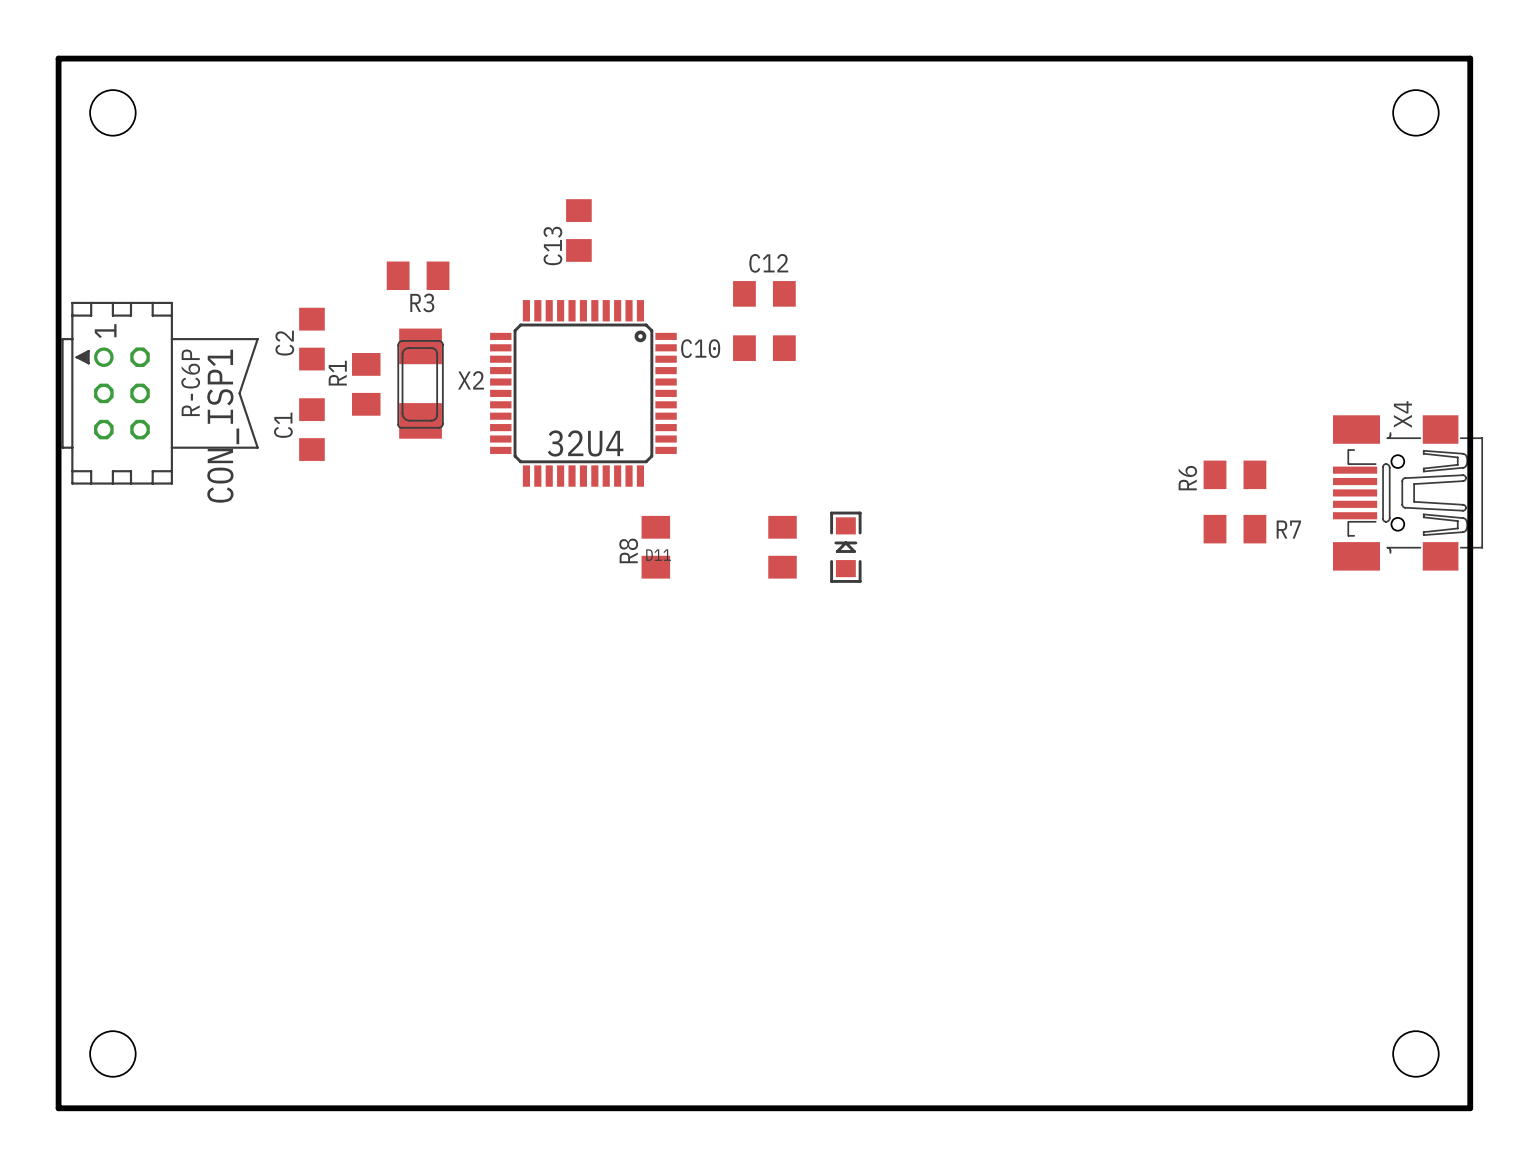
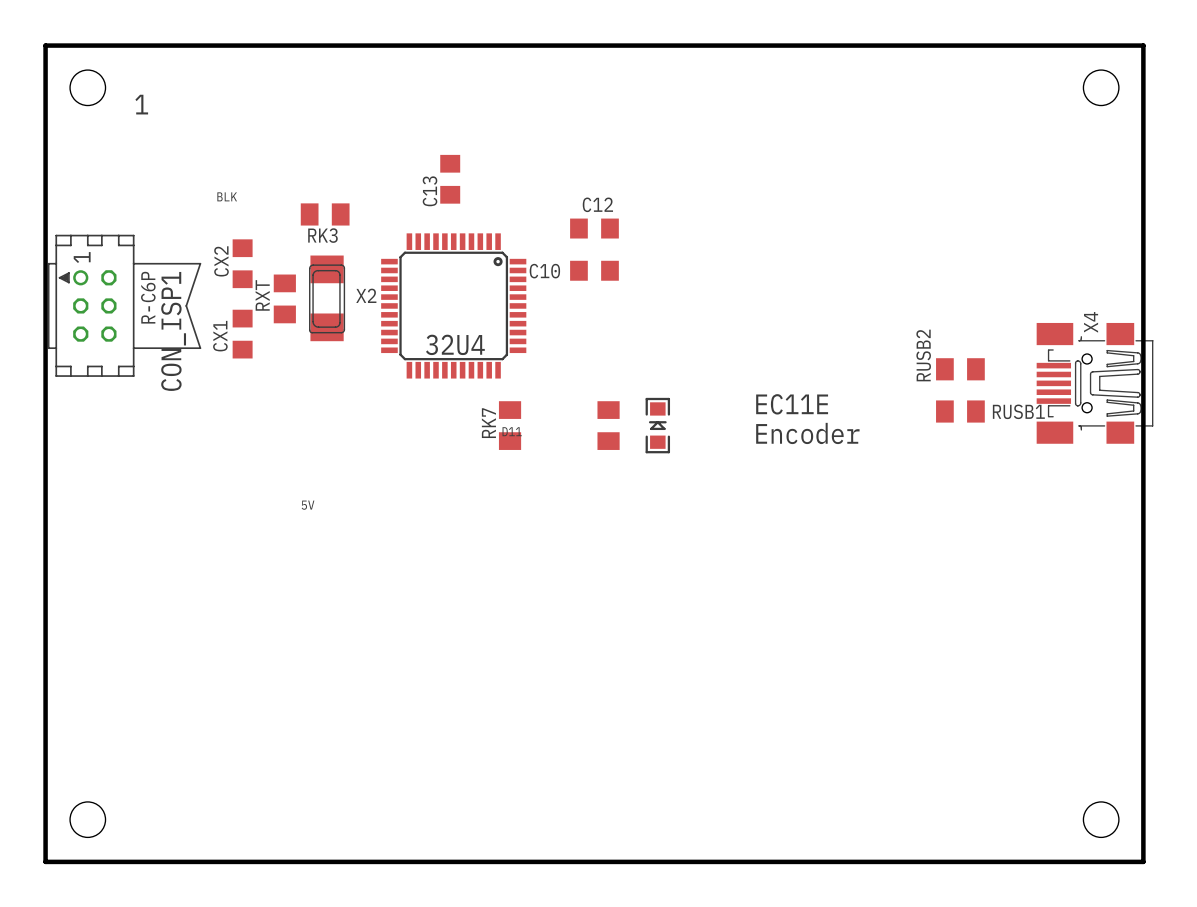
text: none -> 1 (141, 104)
text: none -> BLK (227, 196)
R3 name: R3 (422, 302) -> RK3 (322, 235)
C2 name: C2 (284, 343) -> CX2 (221, 261)
R1 name: R1 (337, 373) -> RXT (262, 295)
C1 name: C1 (283, 425) -> CX1 (220, 336)
R6 name: R6 (1187, 478) -> RUSB2 (923, 355)
text: none -> EC11E (792, 404)
R7 name: R7 (1288, 529) -> RUSB1 (1018, 411)
R8 name: R8 (628, 550) -> RK7 (488, 423)
text: none -> Encoder (807, 433)
text: none -> 5V (308, 505)

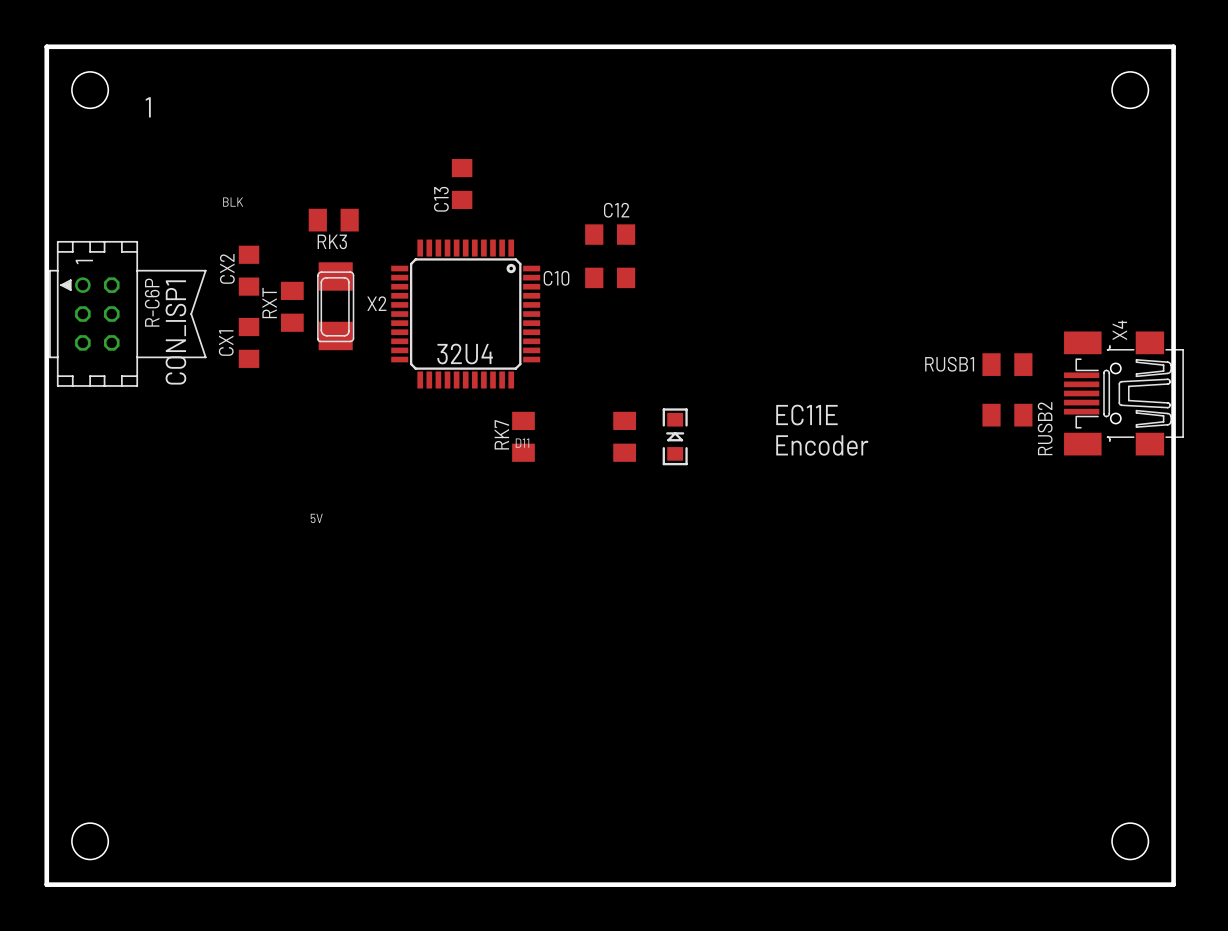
RUSB2 name position: RUSB2 (923, 355) -> RUSB2 (1045, 428)
RUSB2 position: (960, 369) -> (1007, 415)
RUSB1 position: (960, 411) -> (1007, 364)
RUSB1 name position: RUSB1 (1018, 411) -> RUSB1 (949, 364)

